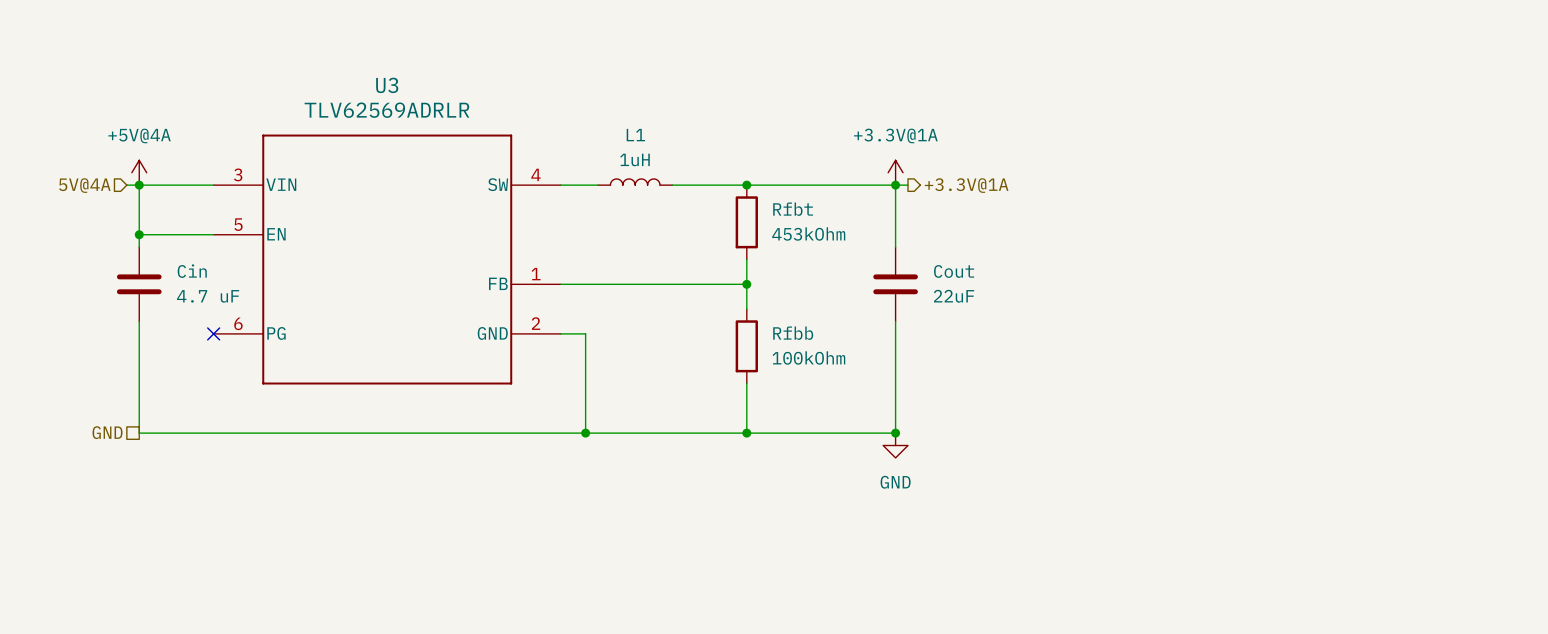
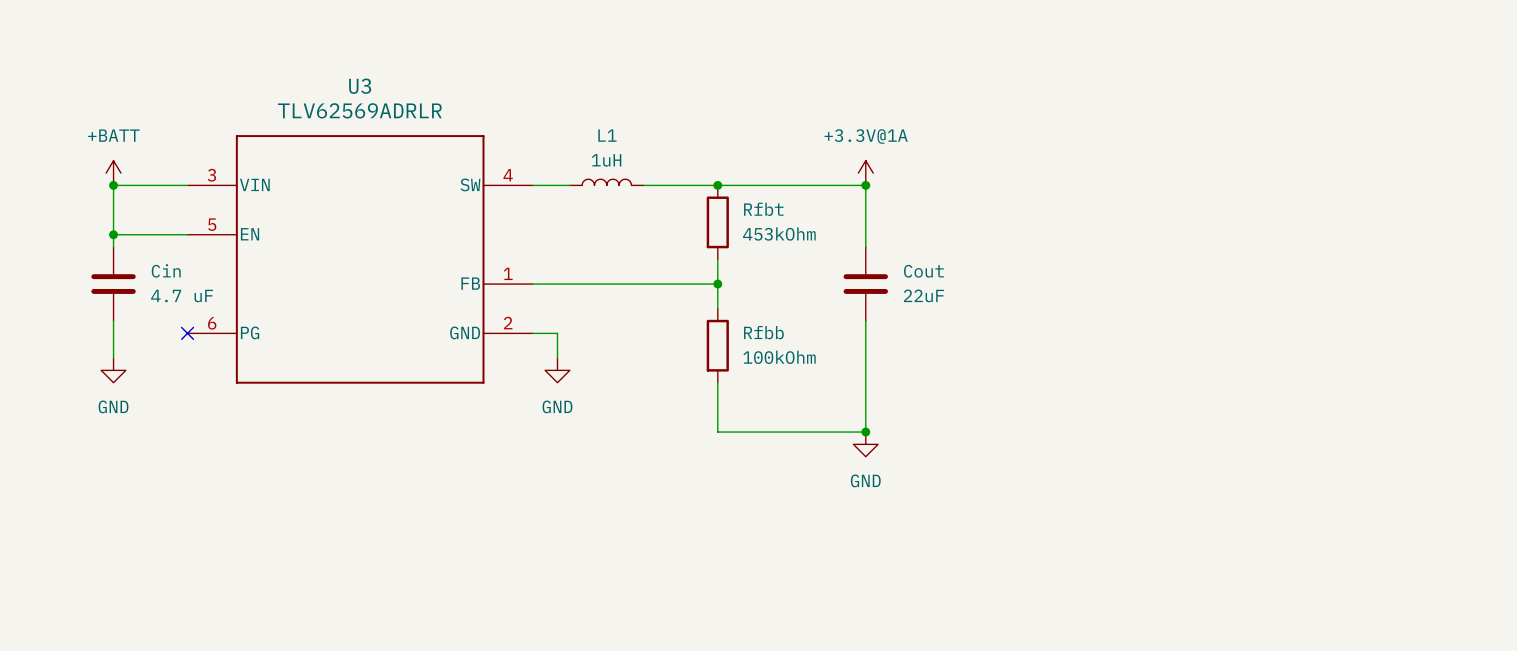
power symbol: +5V@4A (139, 172) -> +BATT (113, 173)
hierarchical label: 5V@4A (84, 185) -> none
wire: (126, 185) (139, 185) -> none
wire: (895, 185) (907, 185) -> none
hierarchical label: +3.3V@1A (966, 185) -> none
wire: (139, 358) (139, 433) (746, 433) -> none
wire: (585, 358) (585, 433) -> none
power symbol: none -> GND (113, 370)
power symbol: none -> GND (557, 370)
hierarchical label: GND (107, 432) -> none
junction: (585, 433) -> none
junction: (746, 433) -> none

